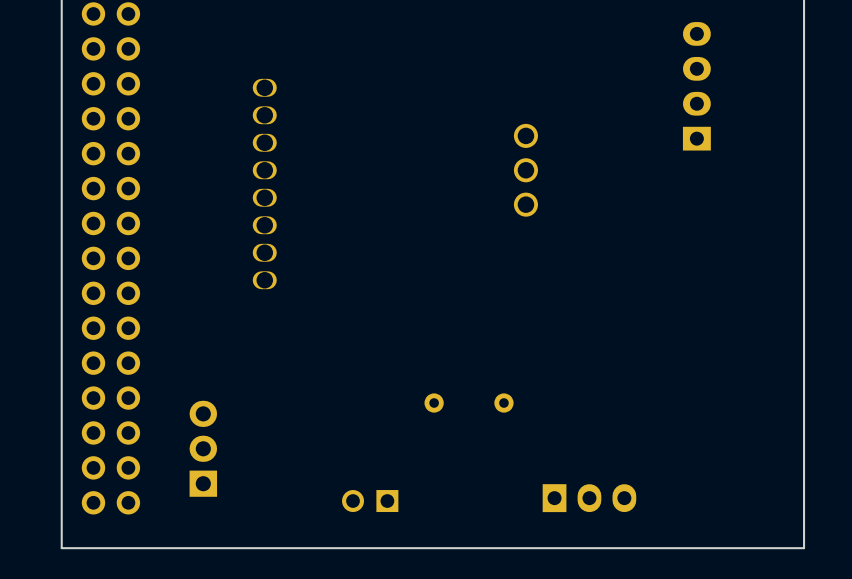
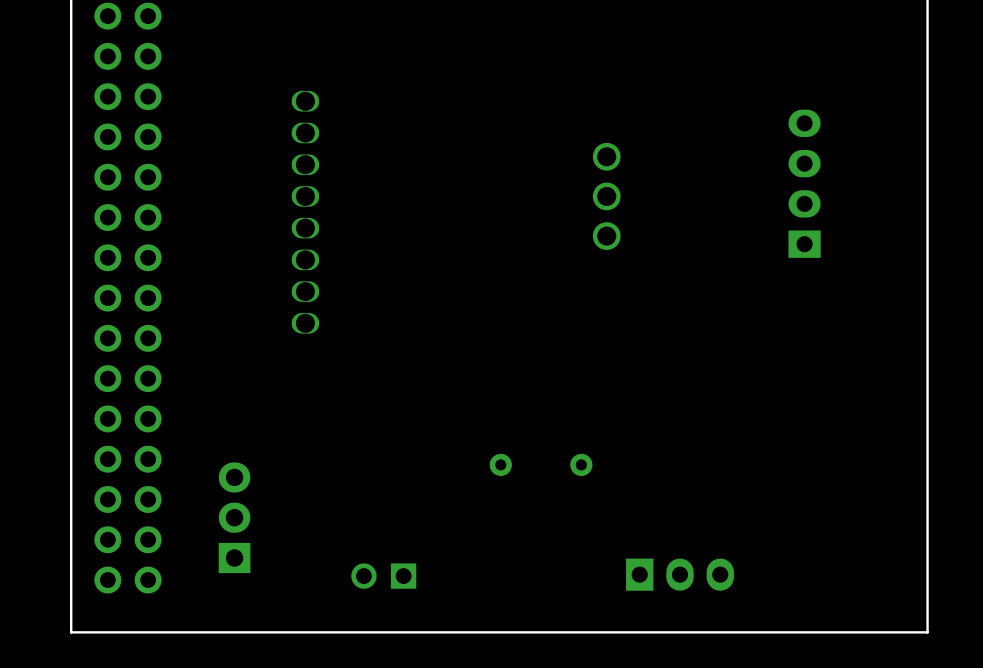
part position: (696, 86) -> (804, 183)
part position: (370, 501) -> (383, 576)

